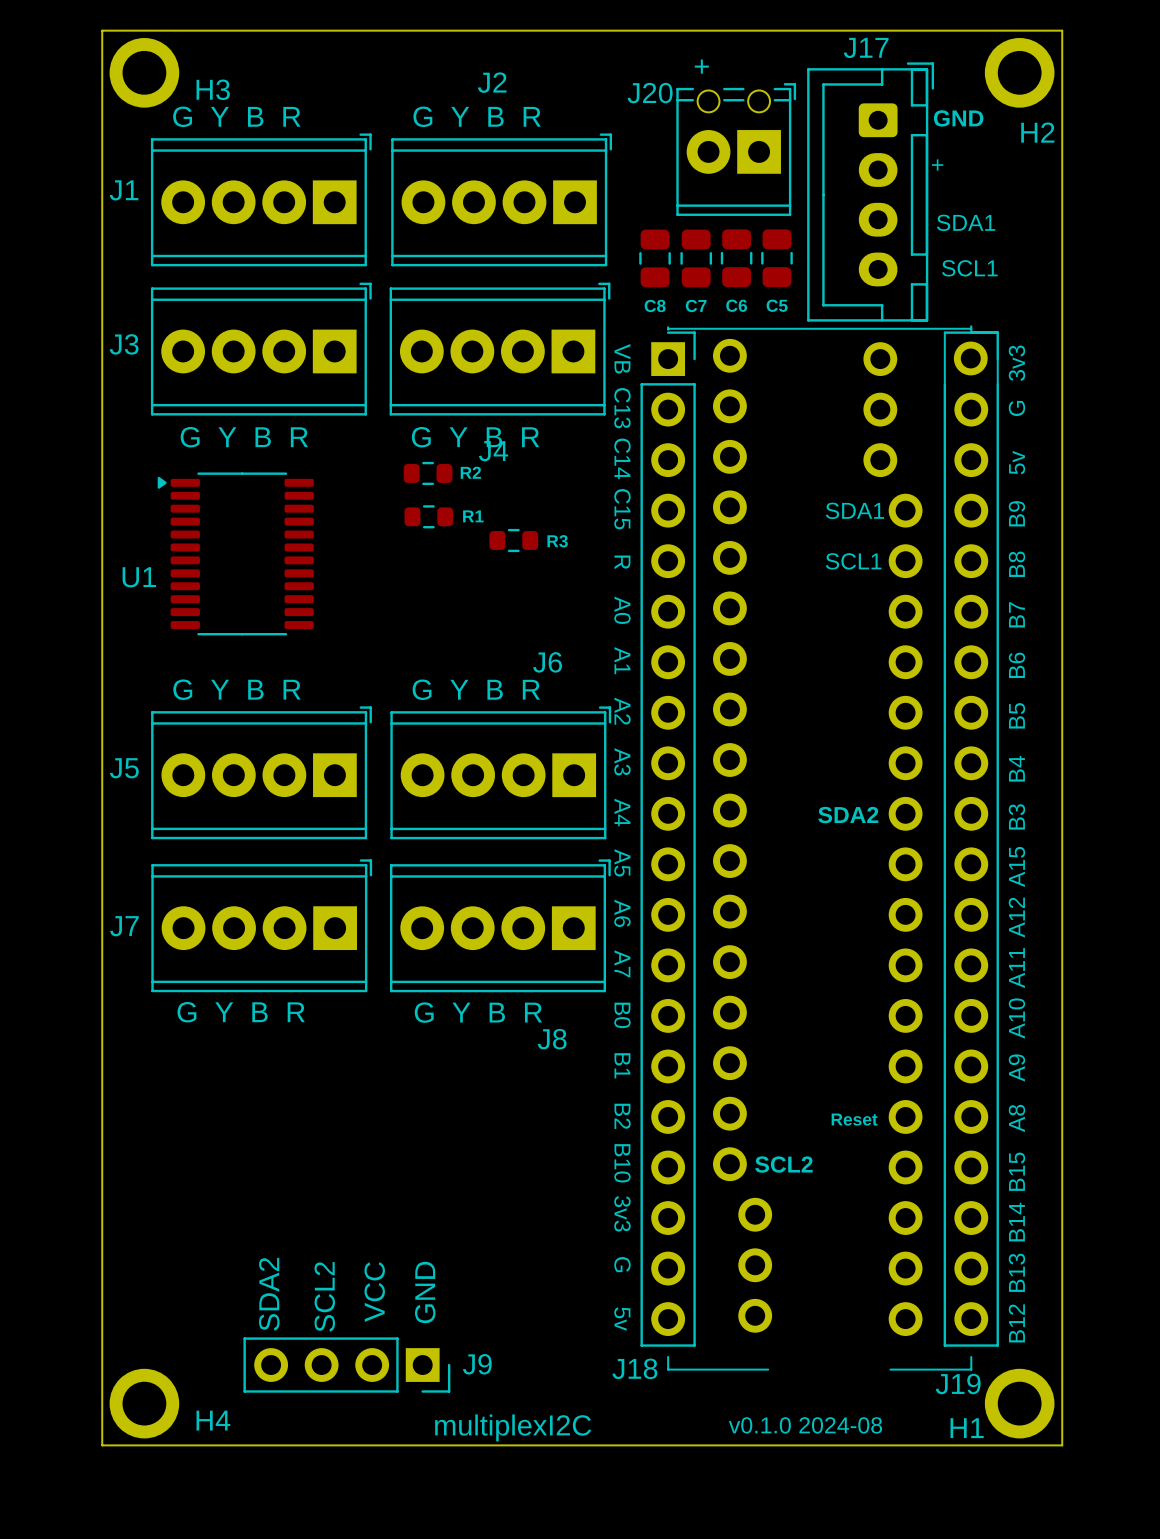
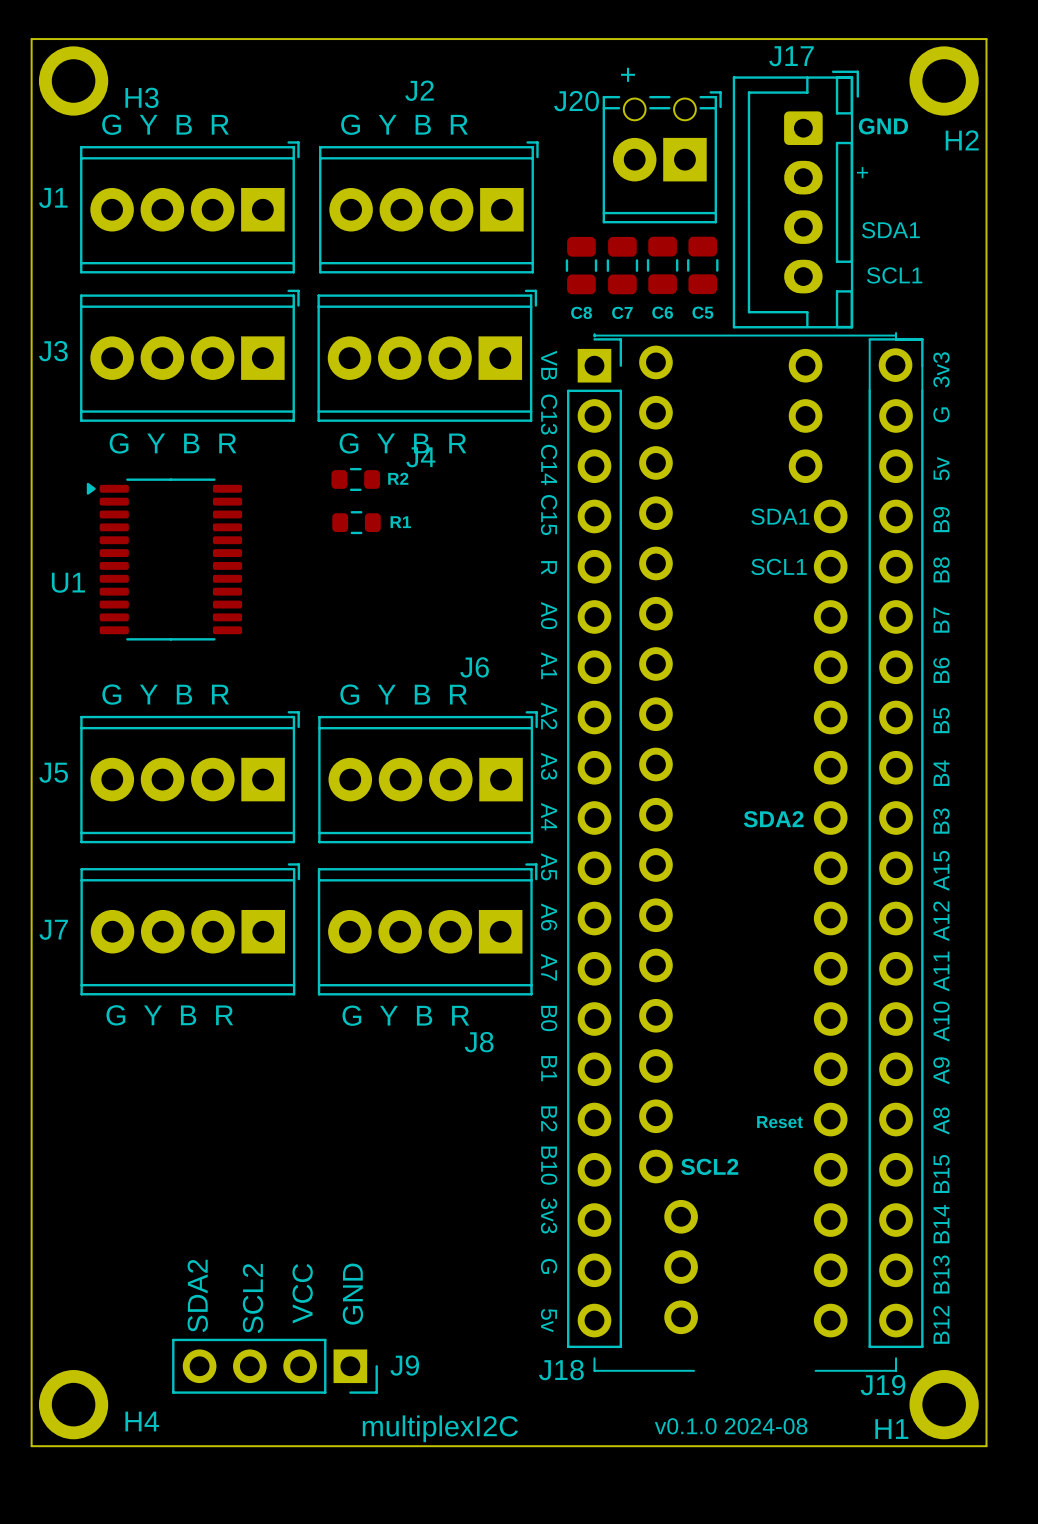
R3: (513, 540) -> none

